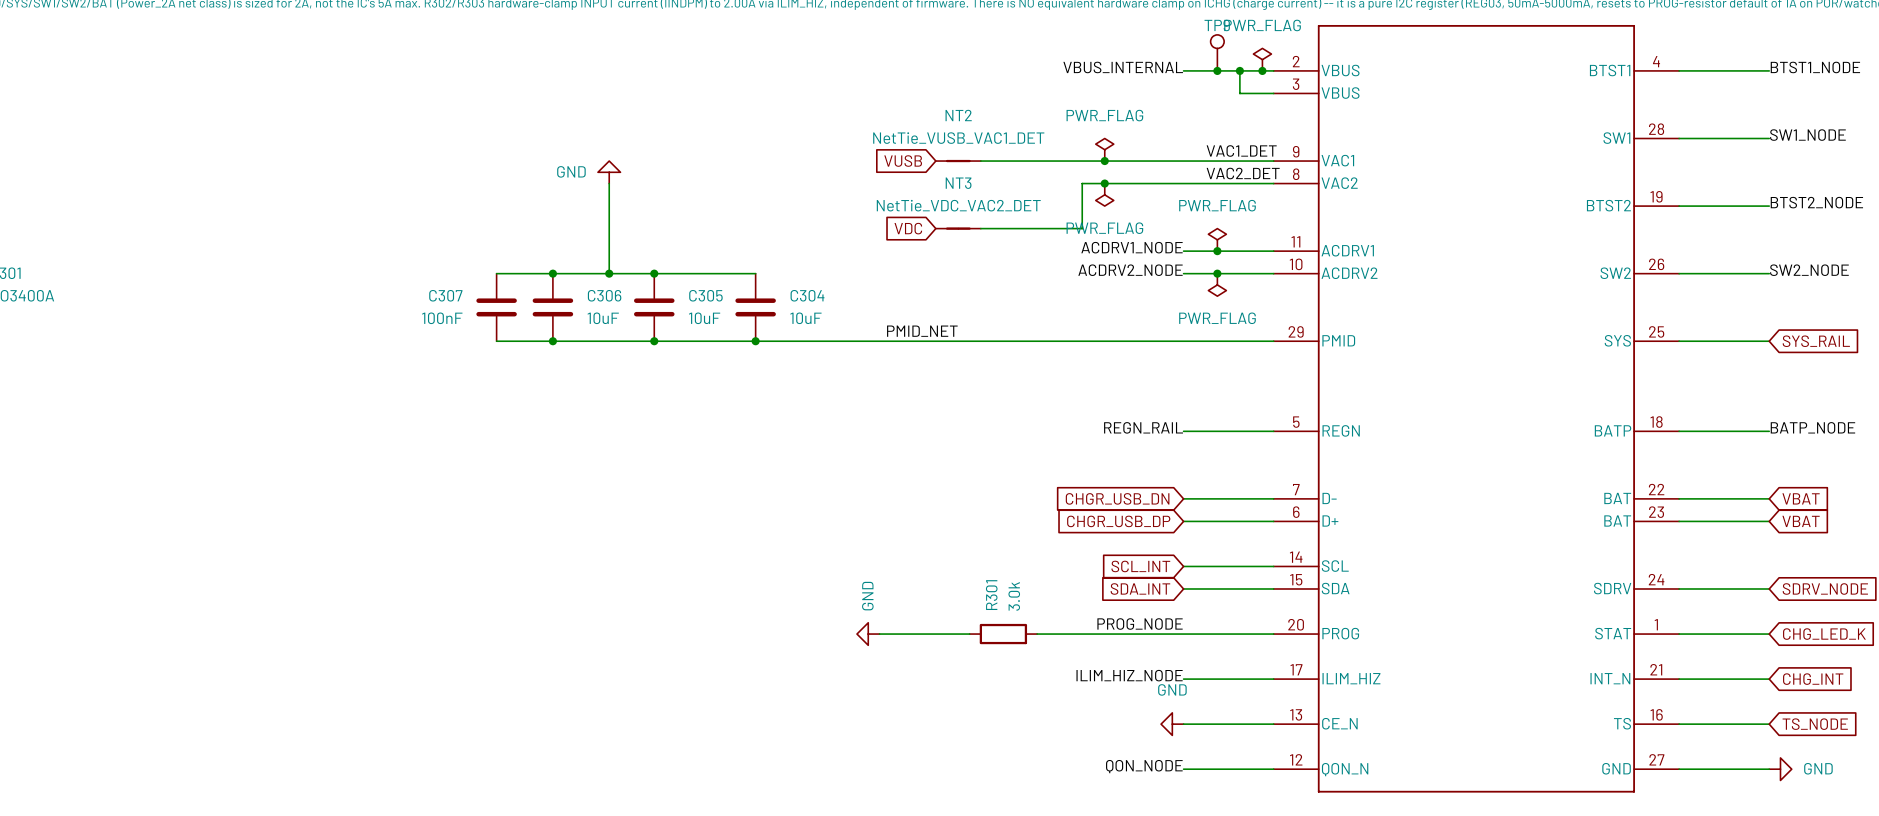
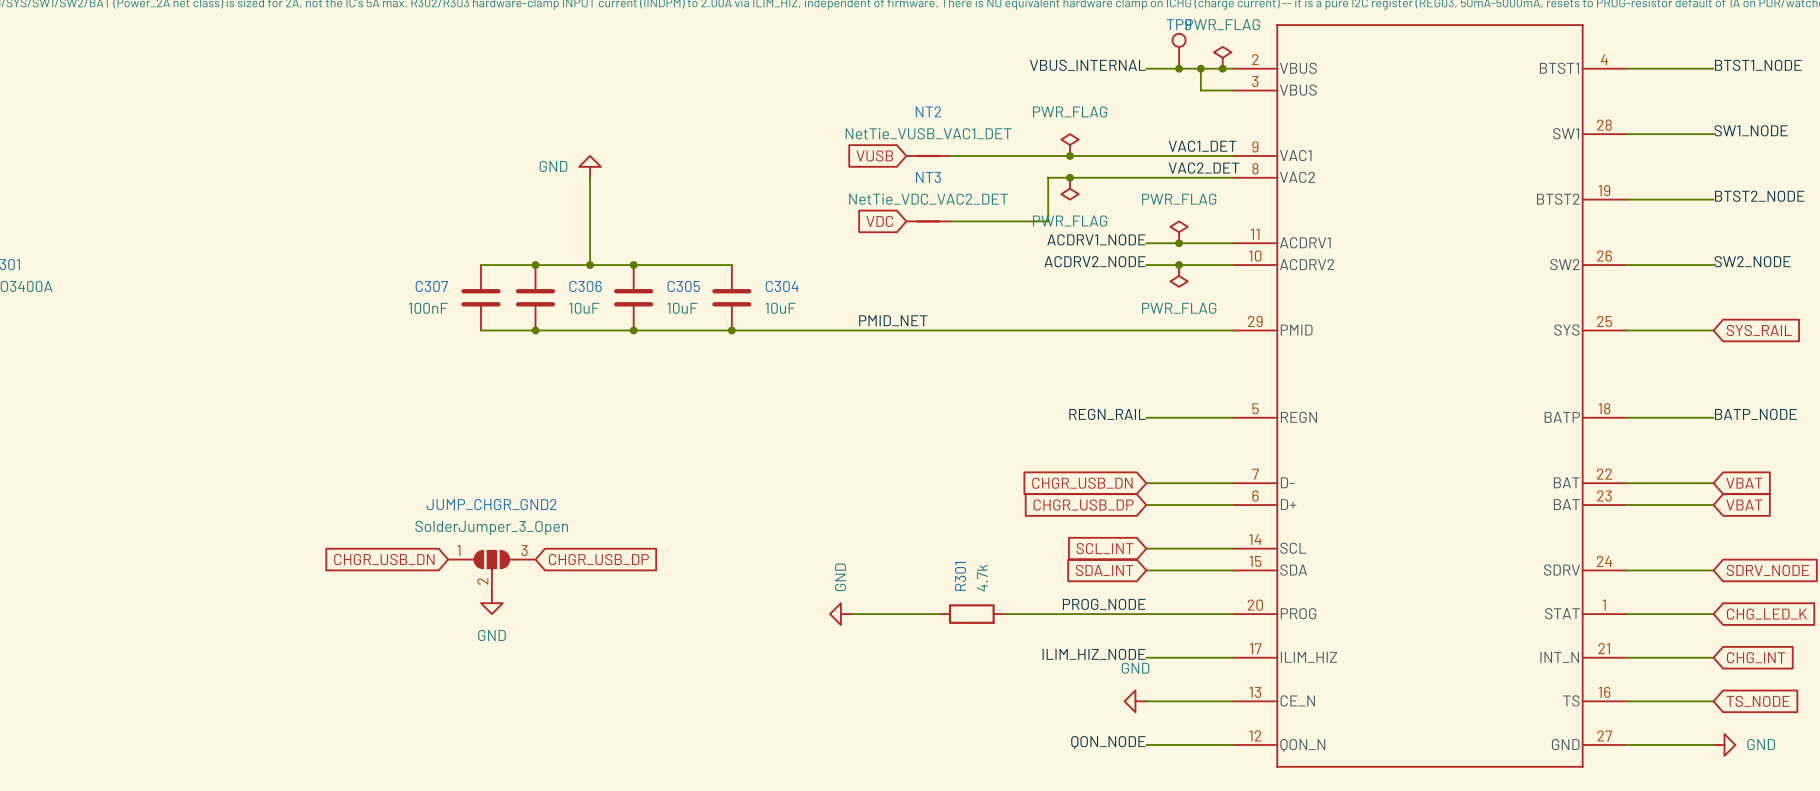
global label: none -> CHGR_USB_DN (384, 559)
global label: none -> CHGR_USB_DP (598, 559)
JUMP_CHGR_GND2: none -> SolderJumper_3_Open (491, 571)
R301 value: 3.0k (1014, 596) -> 4.7k (982, 578)
power symbol: none -> GND (491, 603)

